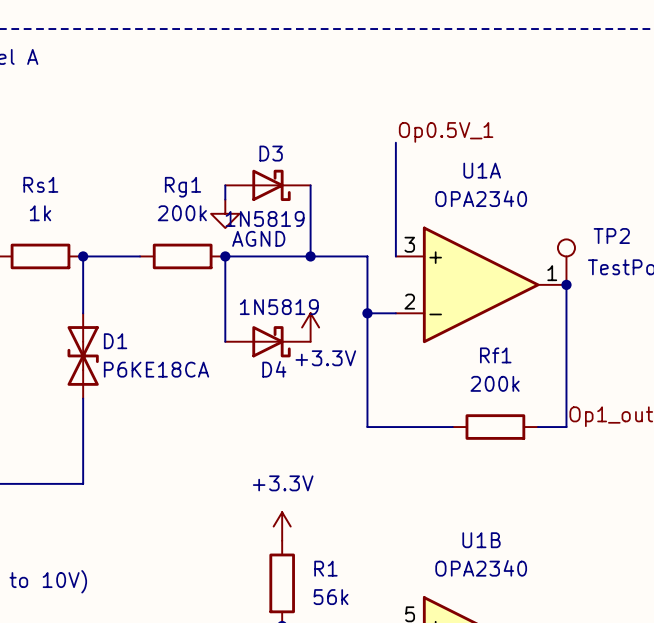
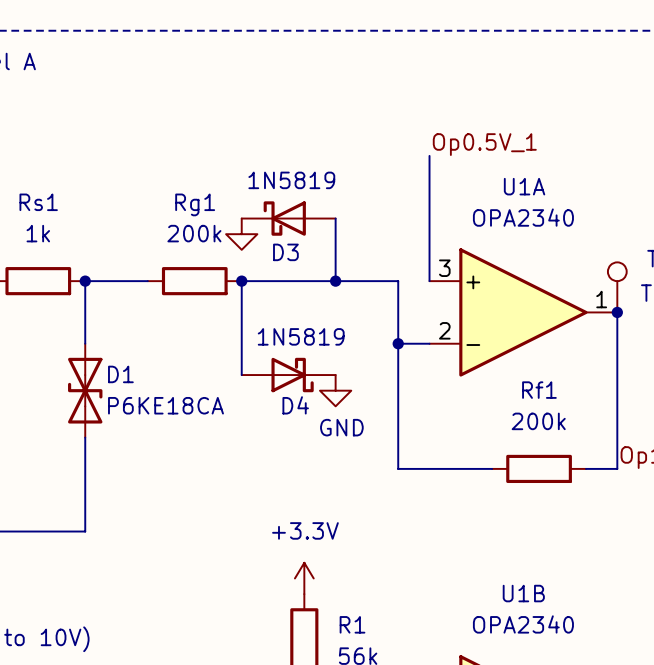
wire: (225, 185) (225, 199) -> none
D3 rotation: 0° (271, 185) -> 180° (284, 218)
wire: (310, 185) (310, 199) -> none
power symbol text: AGND (258, 238) -> none
power symbol: +3.3V (310, 327) -> none
power symbol: none -> GND (335, 390)

